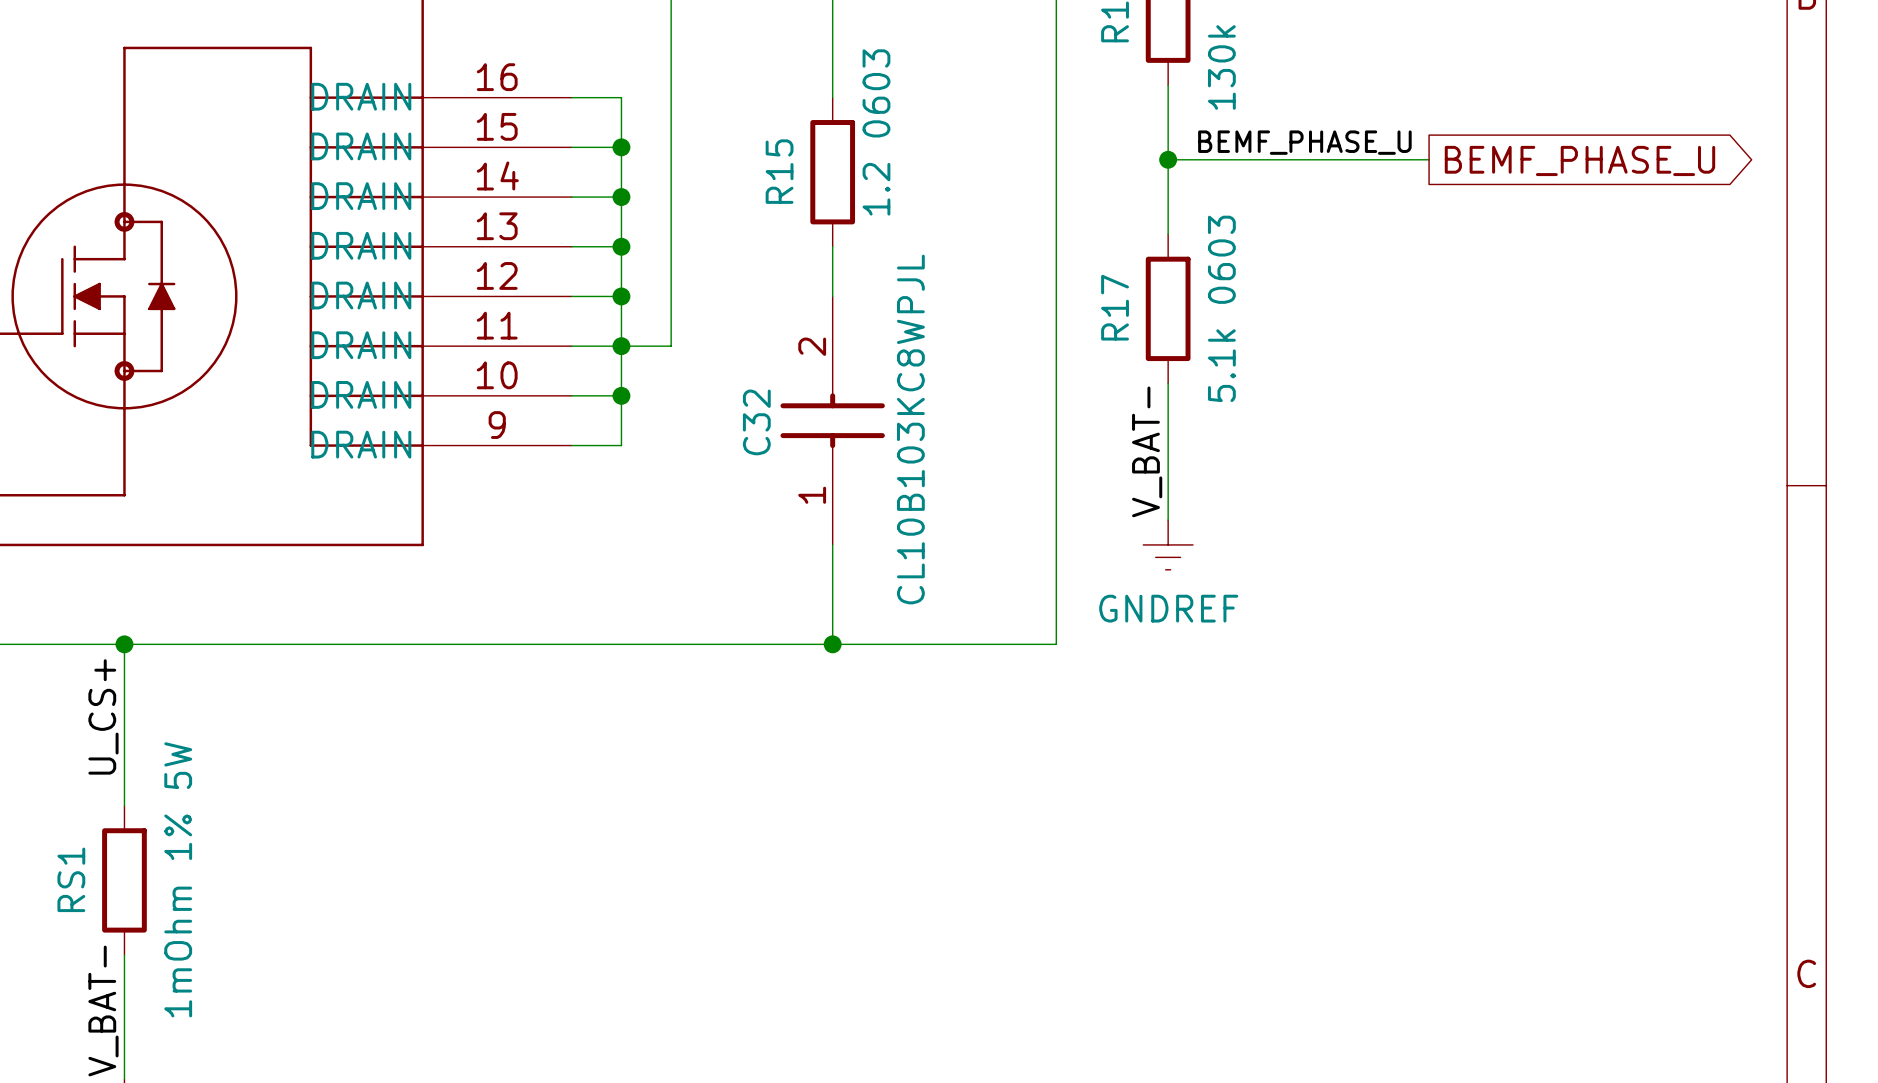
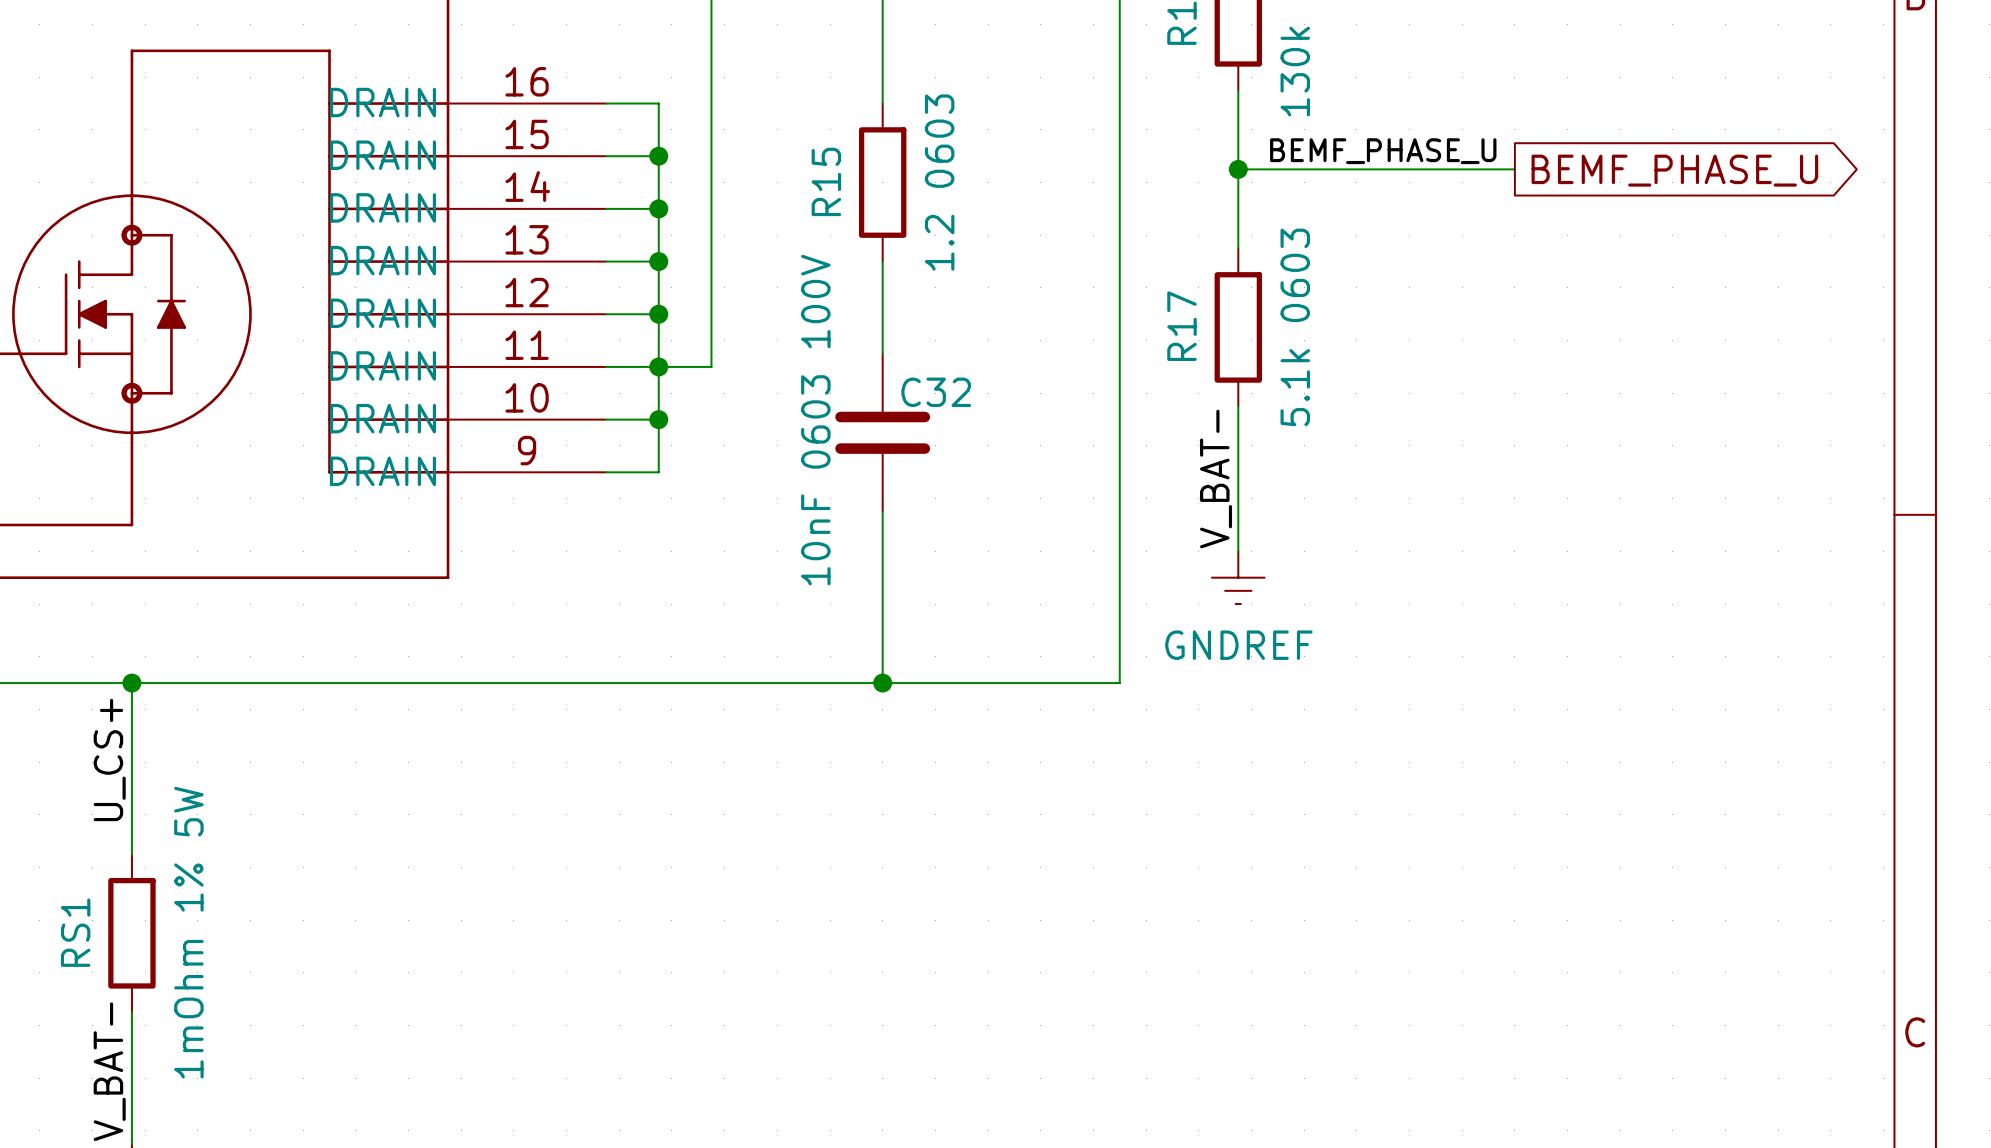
R15 value position: 1.2 0603 (876, 132) -> 1.2 0603 (939, 182)
C32 symbol: [780, 296, 885, 545] -> [835, 353, 931, 512]
C32 name position: C32 (756, 422) -> C32 (936, 392)
C32 value: CL10B103KC8WPJL (910, 429) -> 10nF 0603 100V (815, 420)

